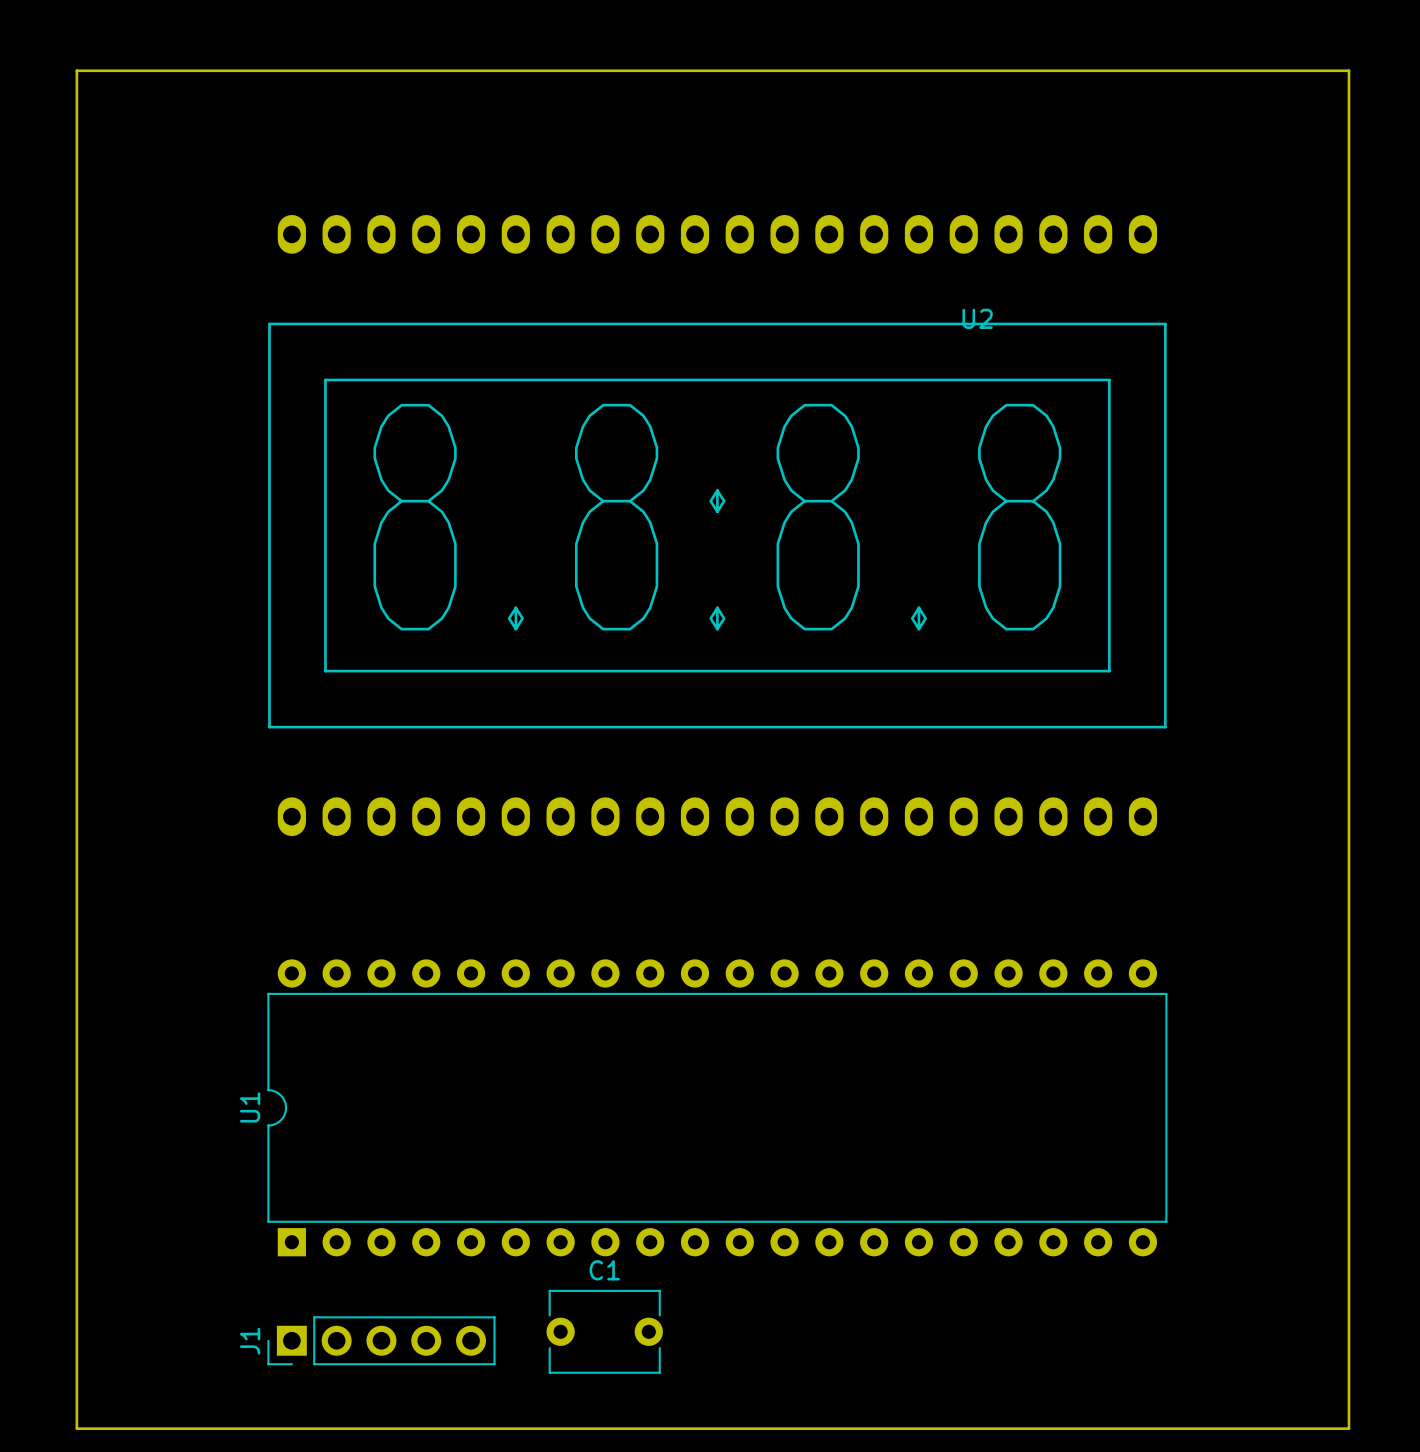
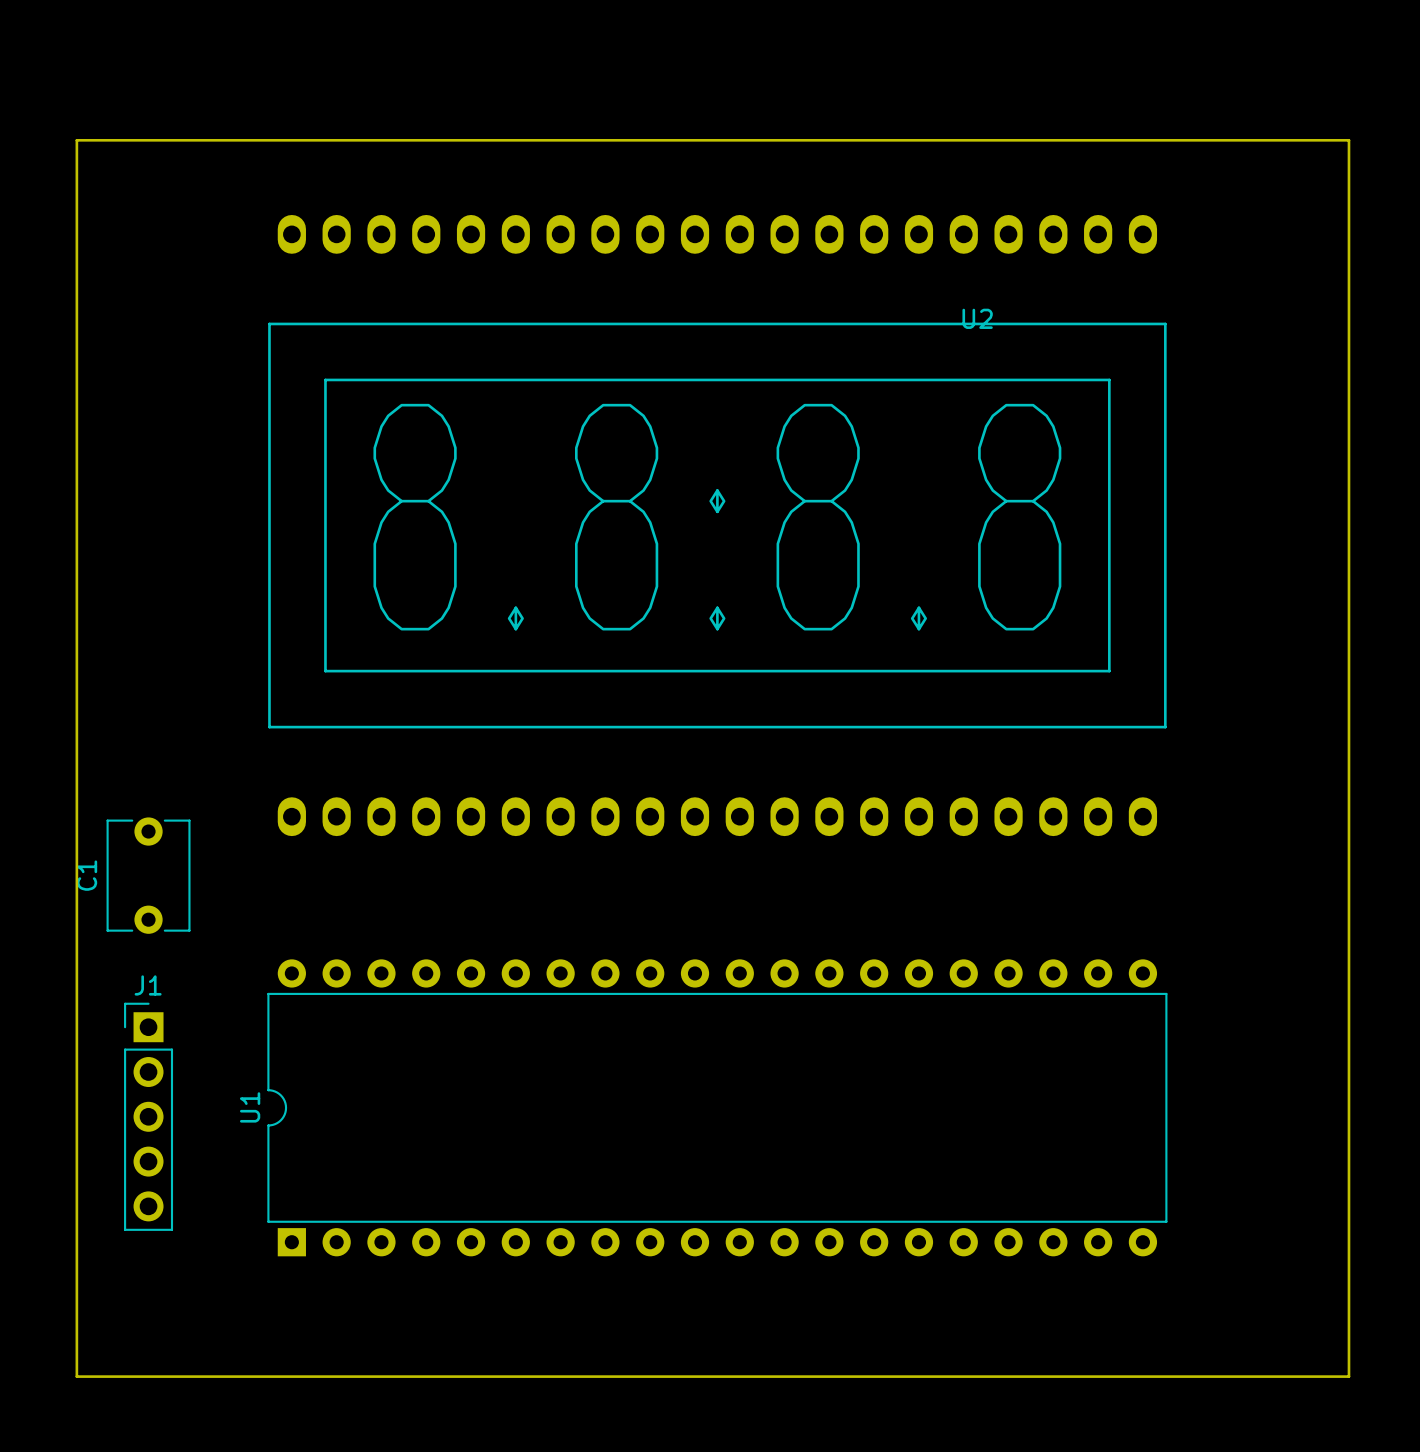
board edge: (76, 140) (76, 70) (1348, 70) (1348, 140) -> (76, 140) (1348, 140)
C1 name position: C1 (604, 1270) -> C1 (87, 875)
C1 rotation: 0° (604, 1331) -> 90° clockwise (148, 875)
C1 position: (604, 1331) -> (148, 875)
J1 rotation: 0° (381, 1340) -> 90° clockwise (148, 1116)
J1 position: (381, 1340) -> (148, 1116)
board edge: (76, 1376) (76, 1428) (1348, 1428) (1348, 1376) -> (76, 1376) (1348, 1376)

